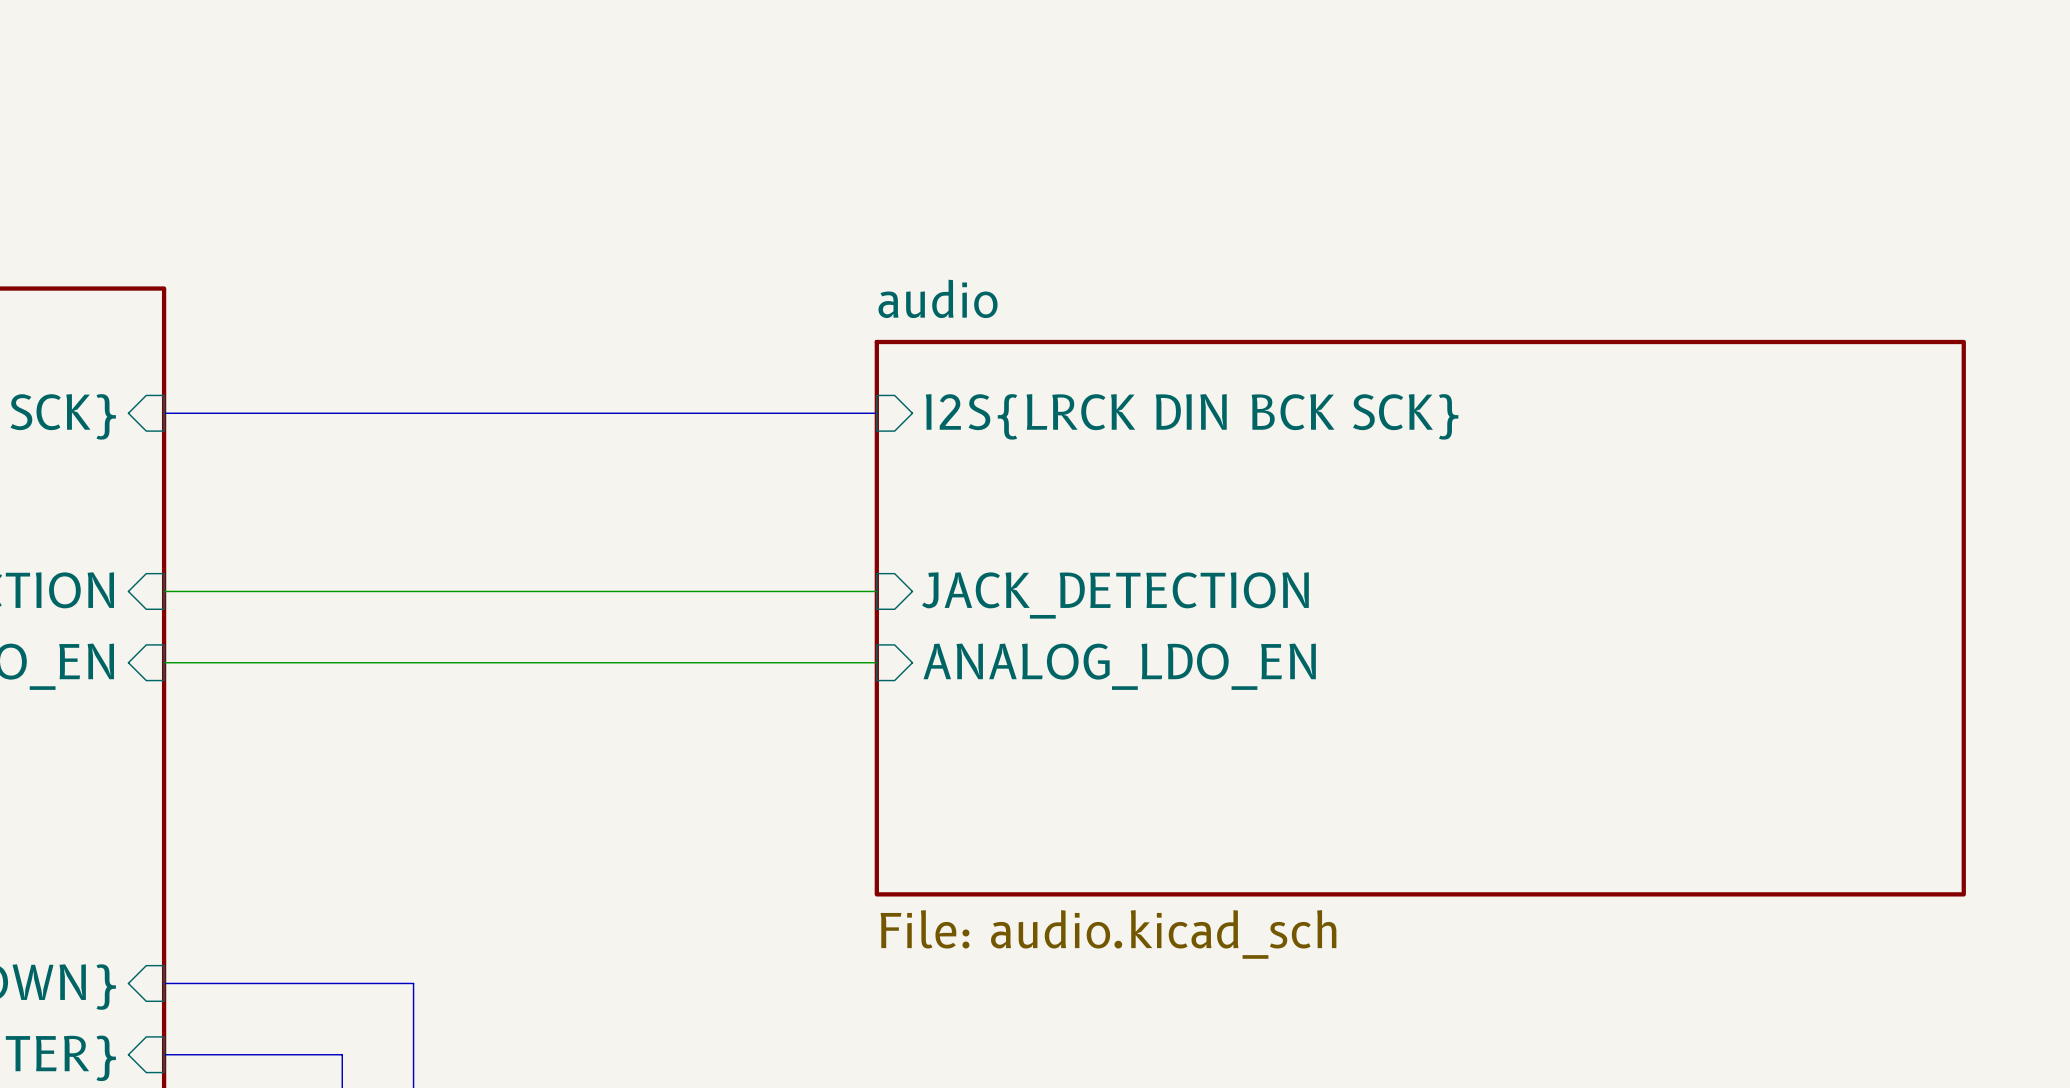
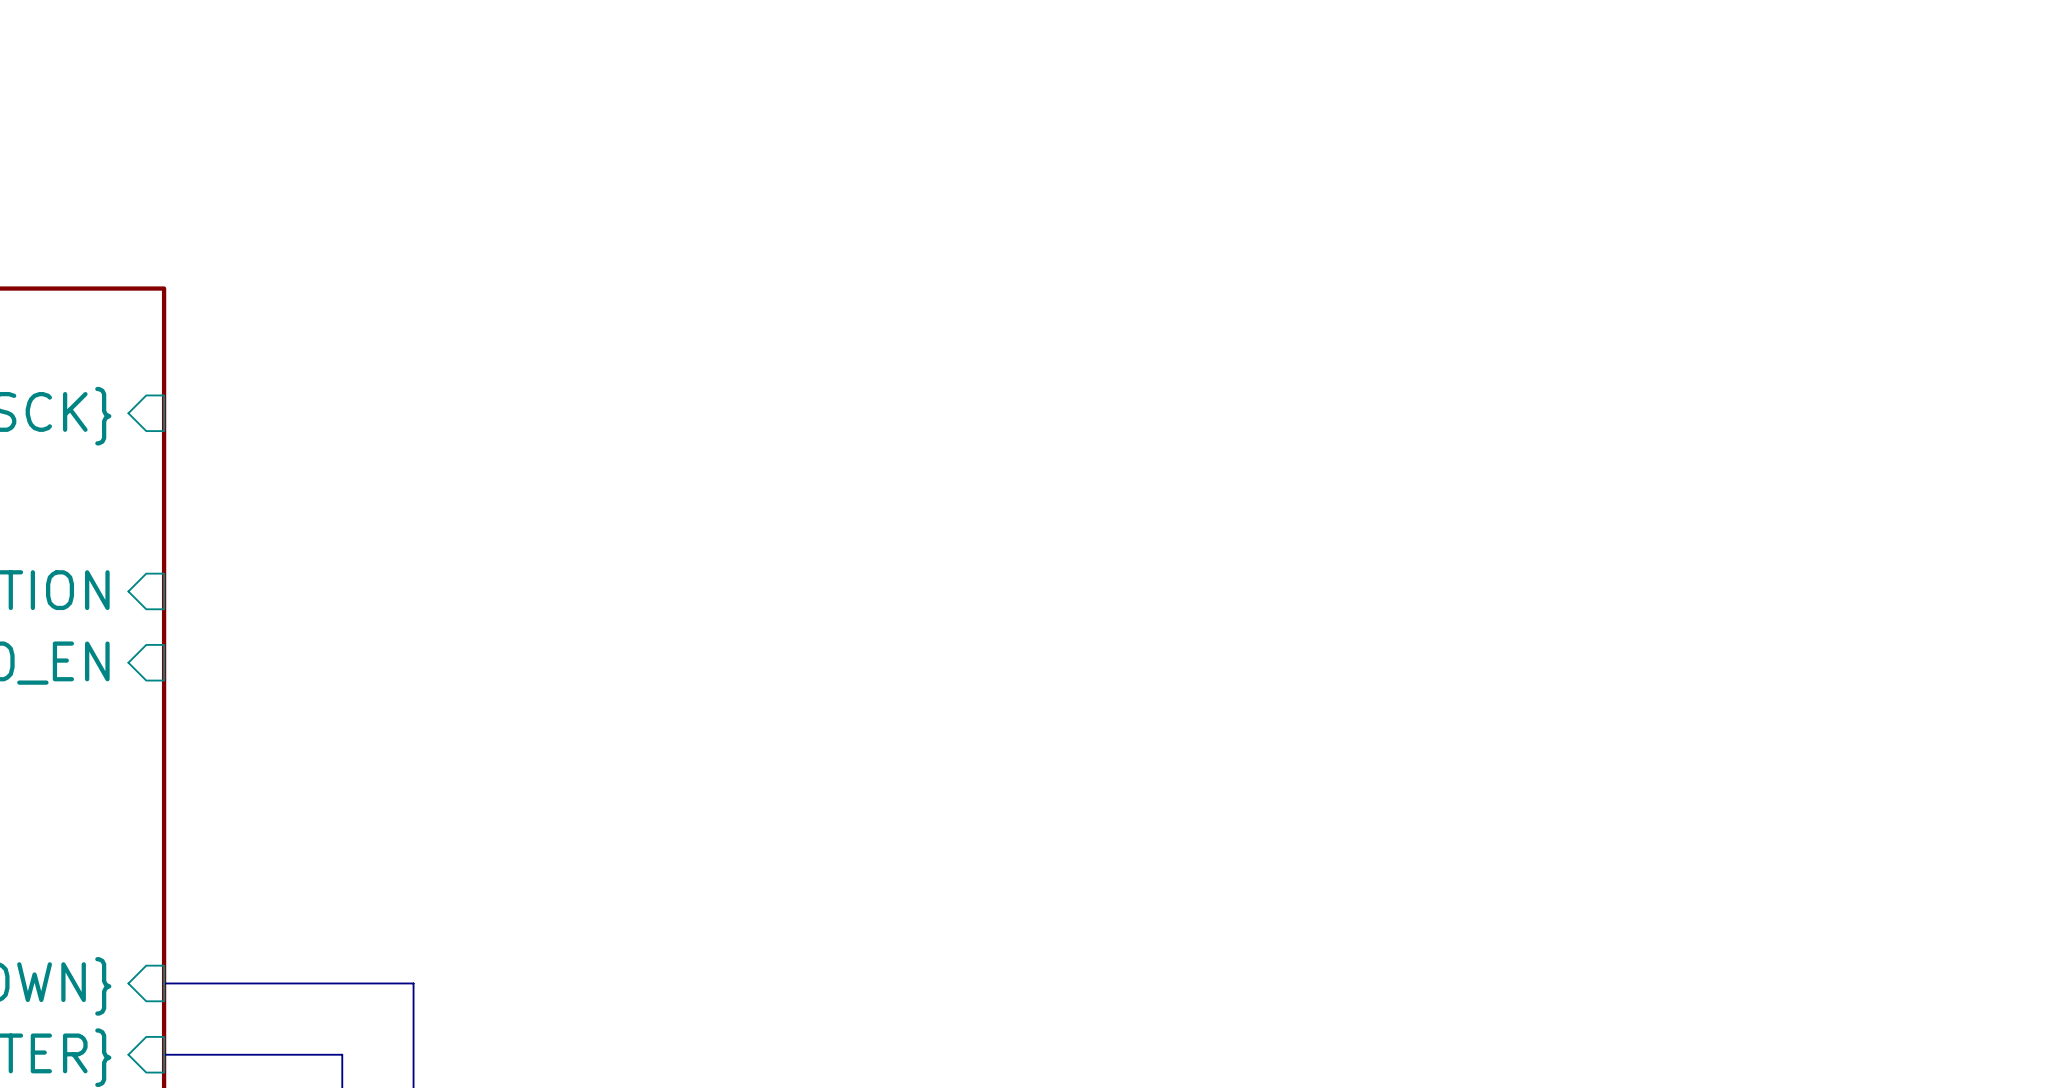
bus: (164, 413) (876, 413) -> none
sheet pin: I2S{LRCK DIN BCK SCK} (1192, 416) -> none
wire: (164, 591) (876, 591) -> none
sheet pin: JACK_DETECTION (1115, 595) -> none
sheet audio: File: audio.kicad_sch (1420, 618) -> none
wire: (164, 662) (876, 662) -> none
sheet pin: ANALOG_LDO_EN (1119, 666) -> none

